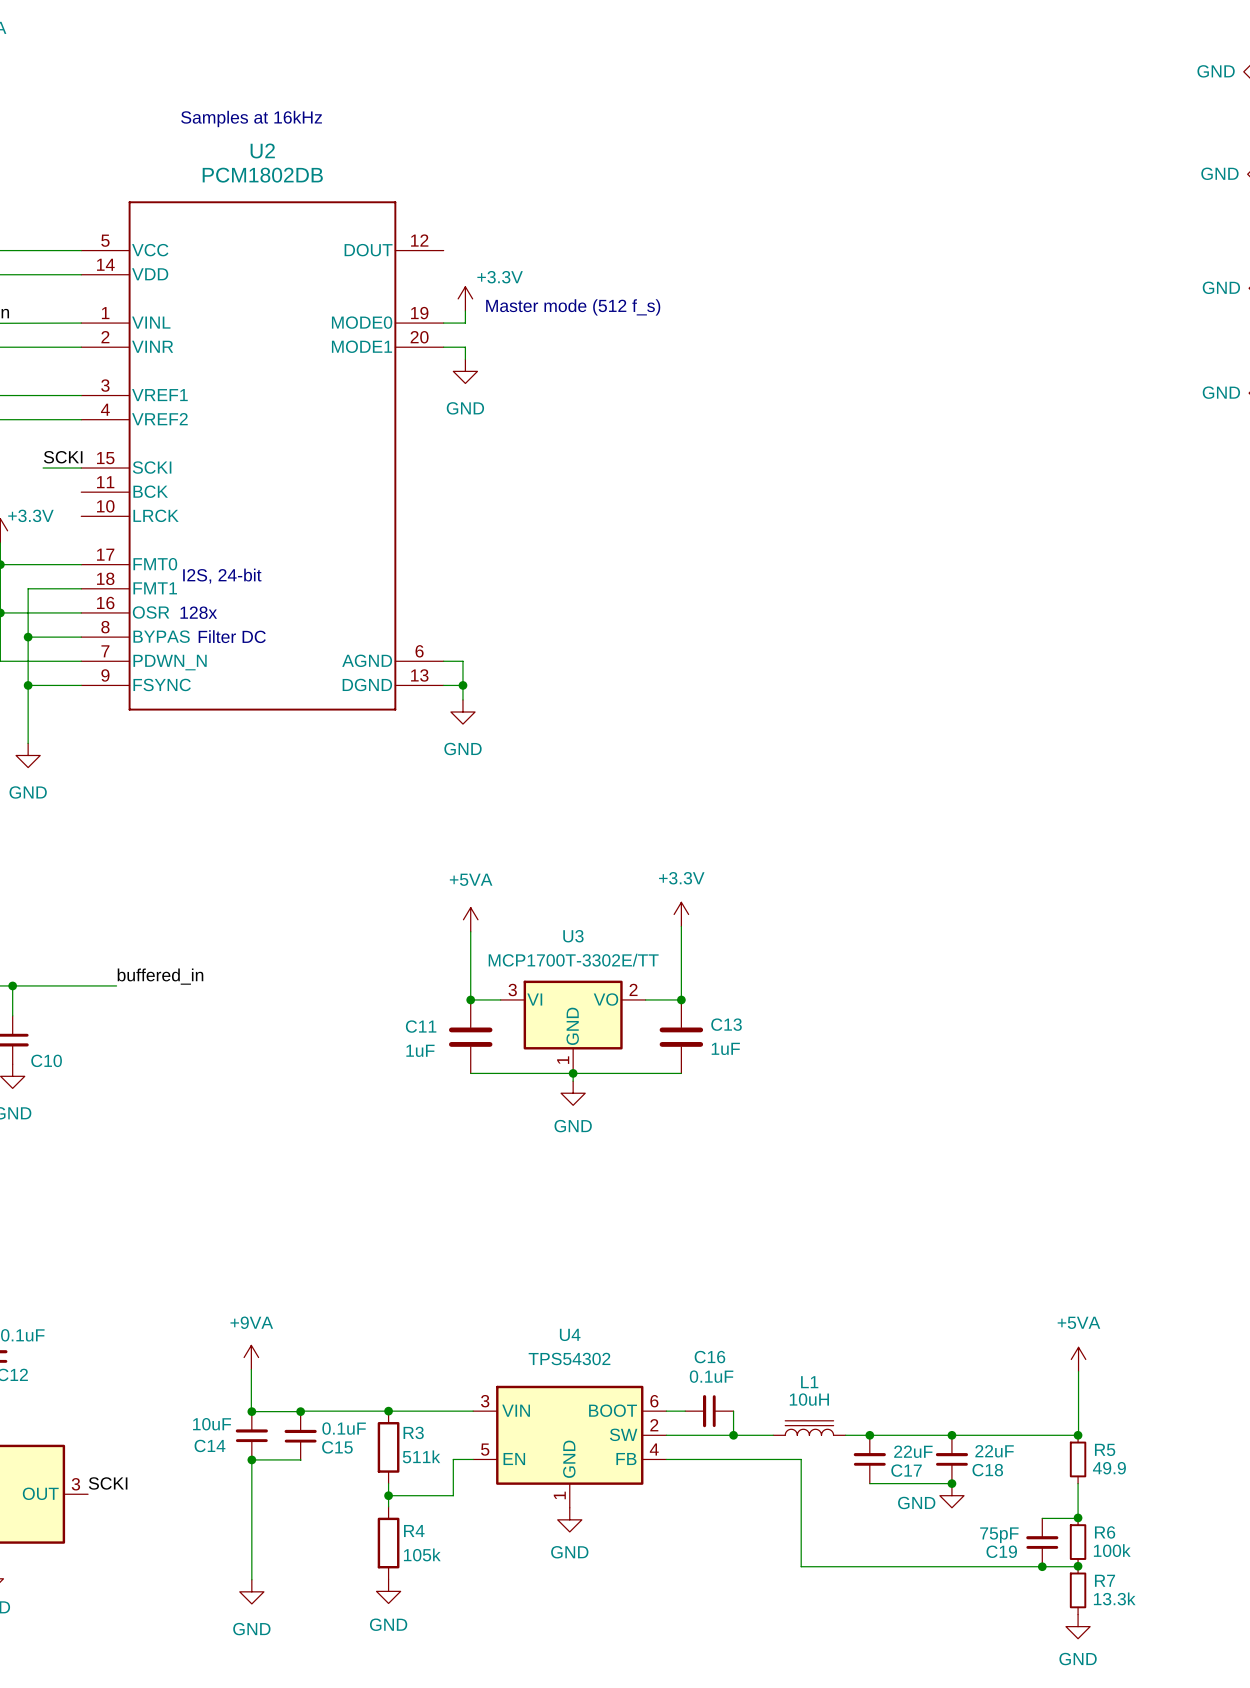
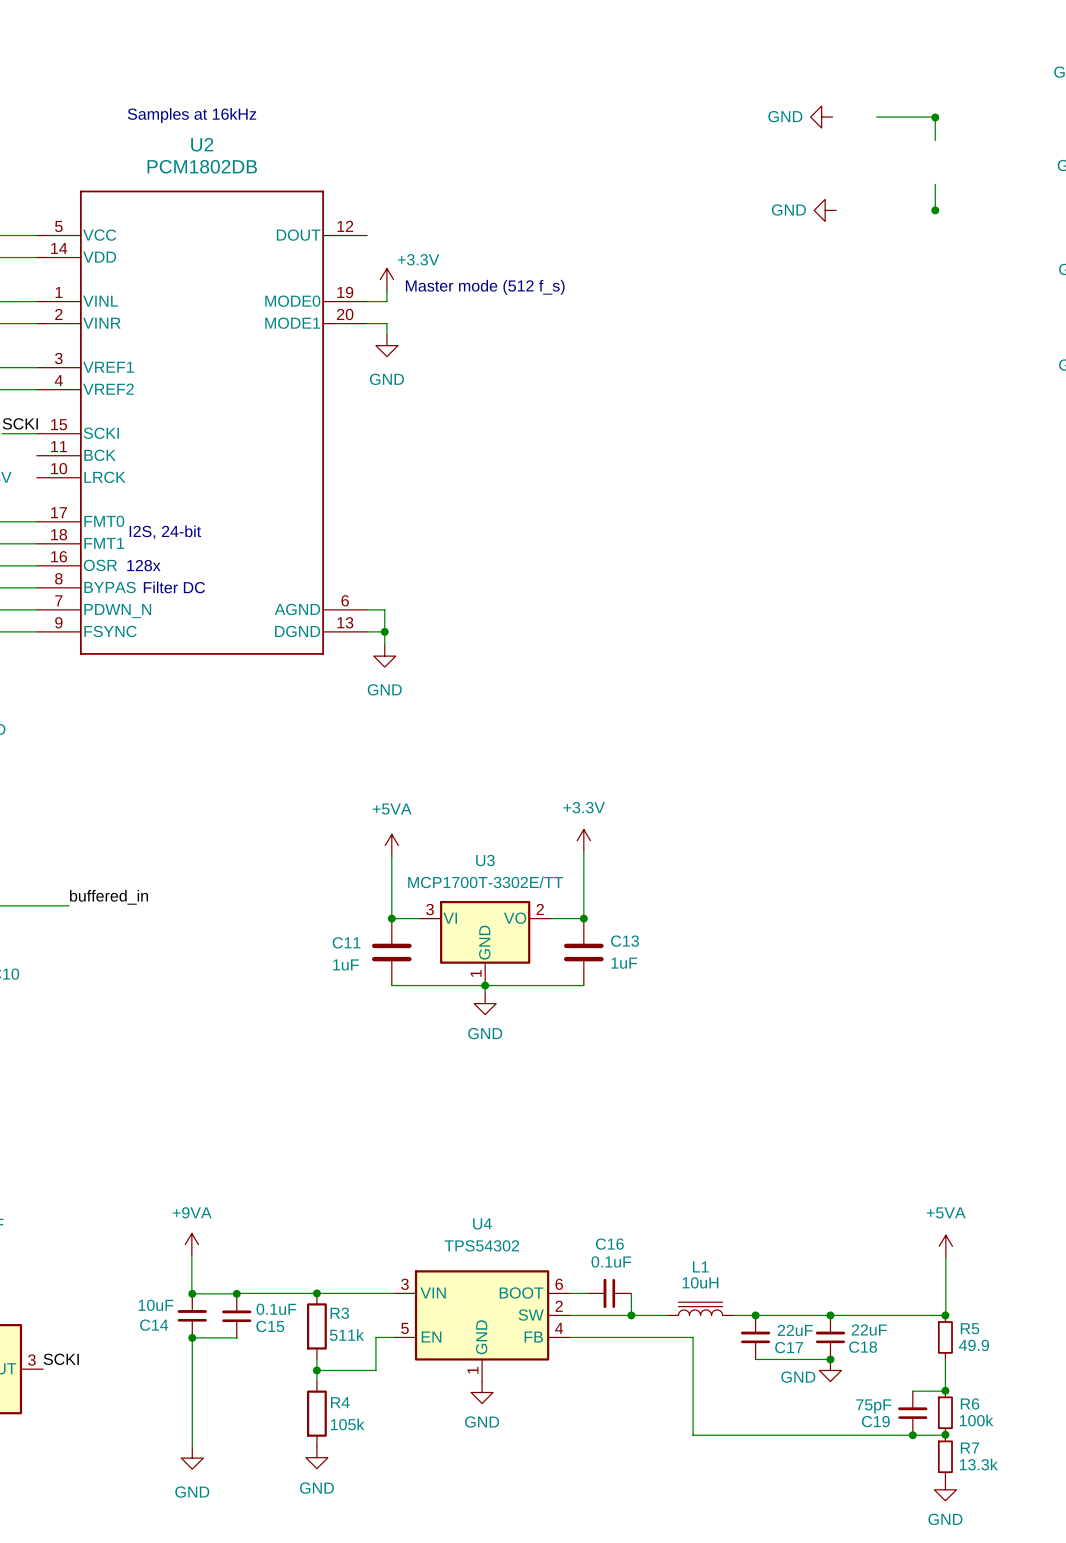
power symbol: none -> GND (821, 117)
wire: none -> (876, 117) (935, 117) (935, 140)
junction: none -> (935, 117)
wire: none -> (935, 184) (935, 210)
power symbol: none -> GND (825, 210)
junction: none -> (935, 210)

